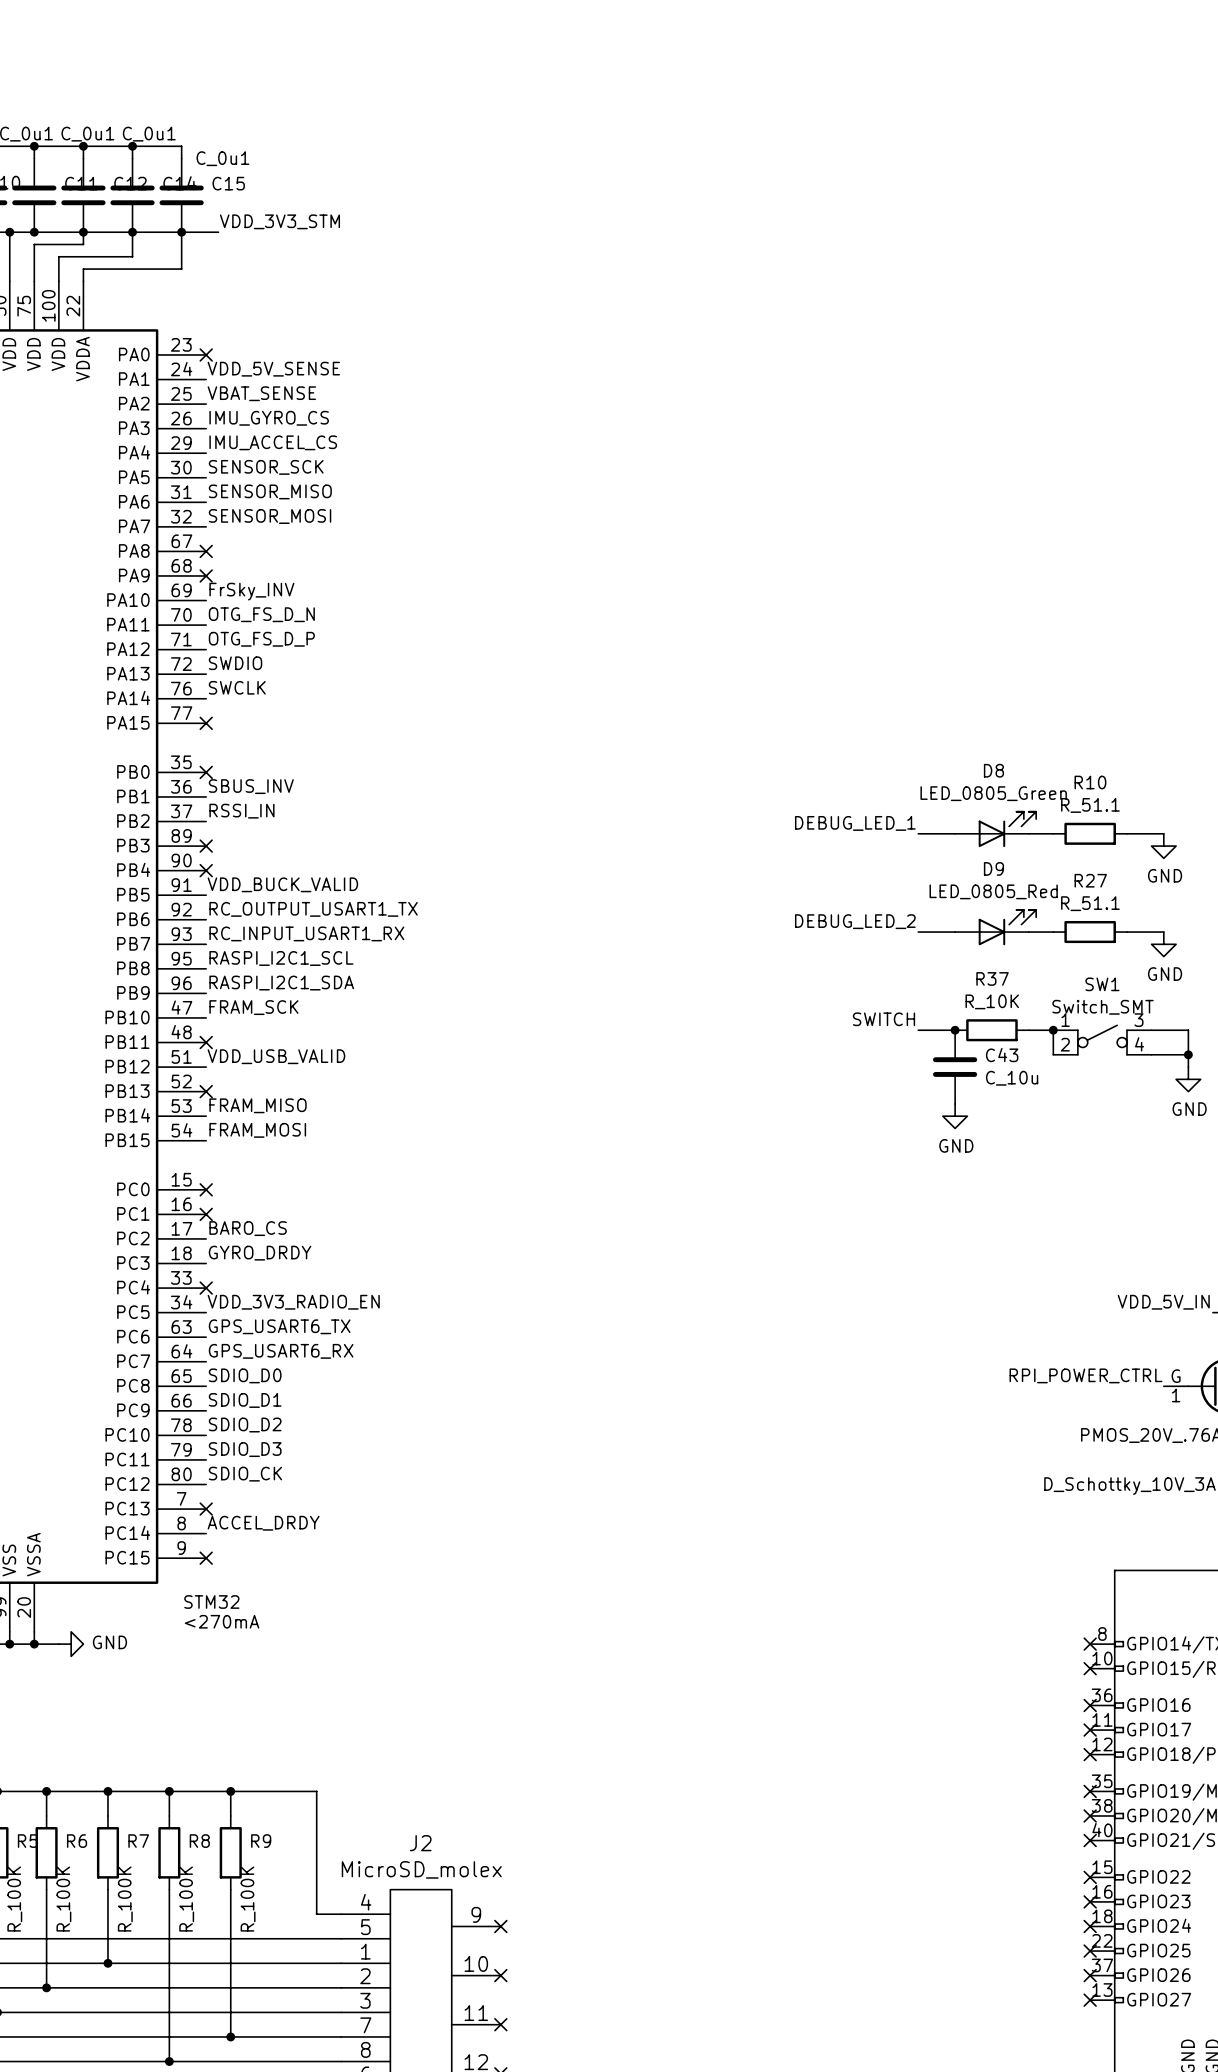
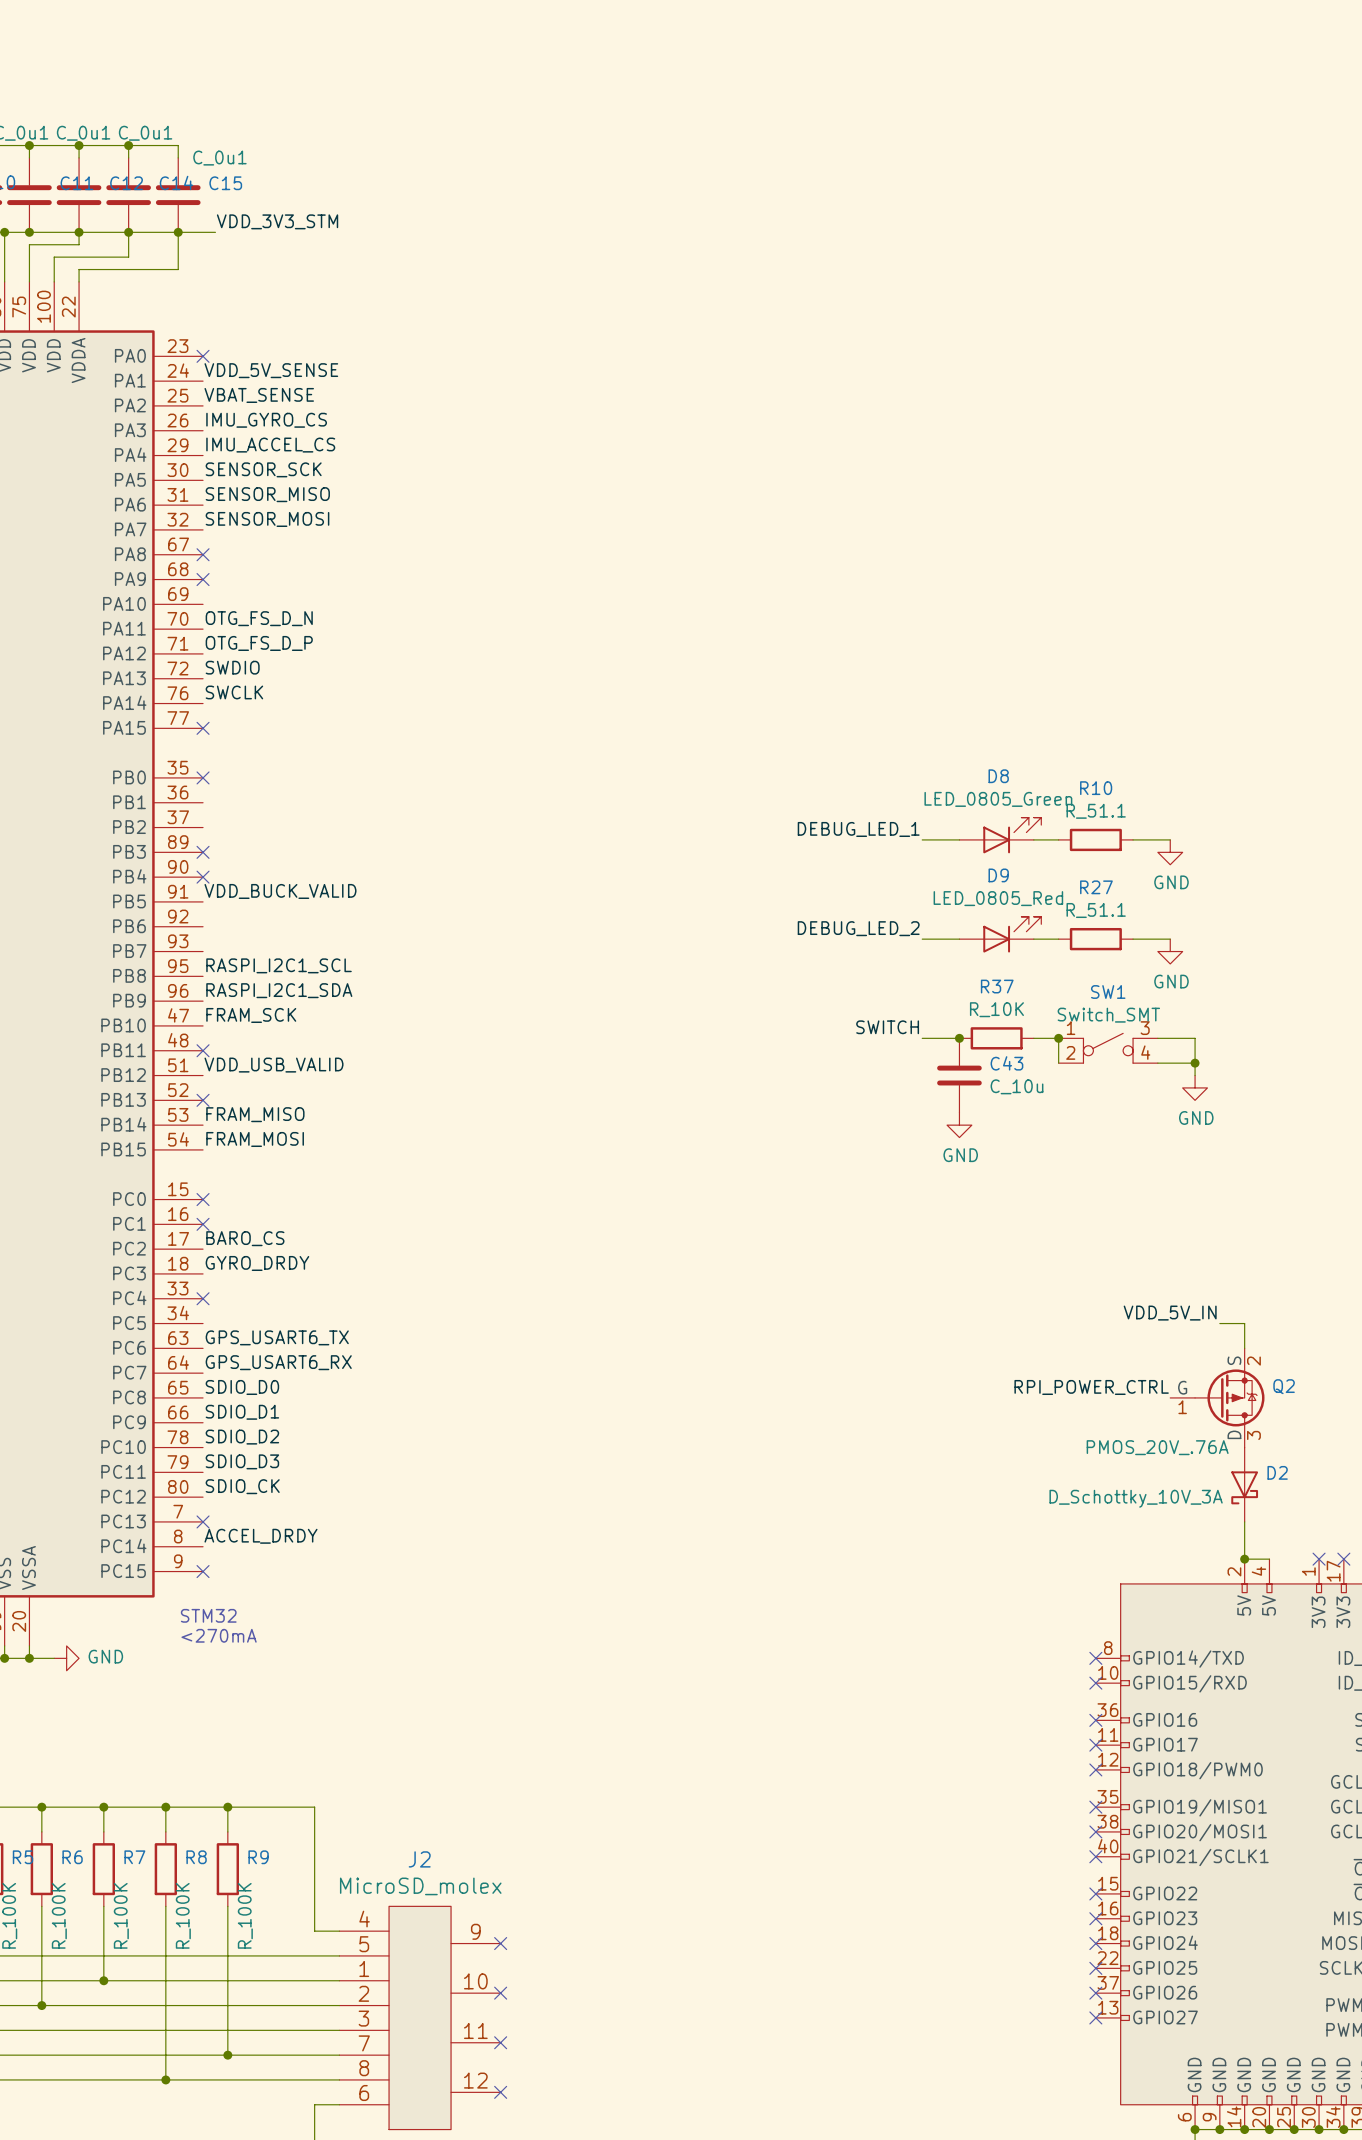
label: FrSky_INV (251, 591) -> none
label: SBUS_INV (251, 786) -> none
label: RSSI_IN (241, 811) -> none
label: RC_OUTPUT_USART1_TX (313, 909) -> none
label: RC_INPUT_USART1_RX (306, 933) -> none
label: VDD_3V3_RADIO_EN (293, 1302) -> none

